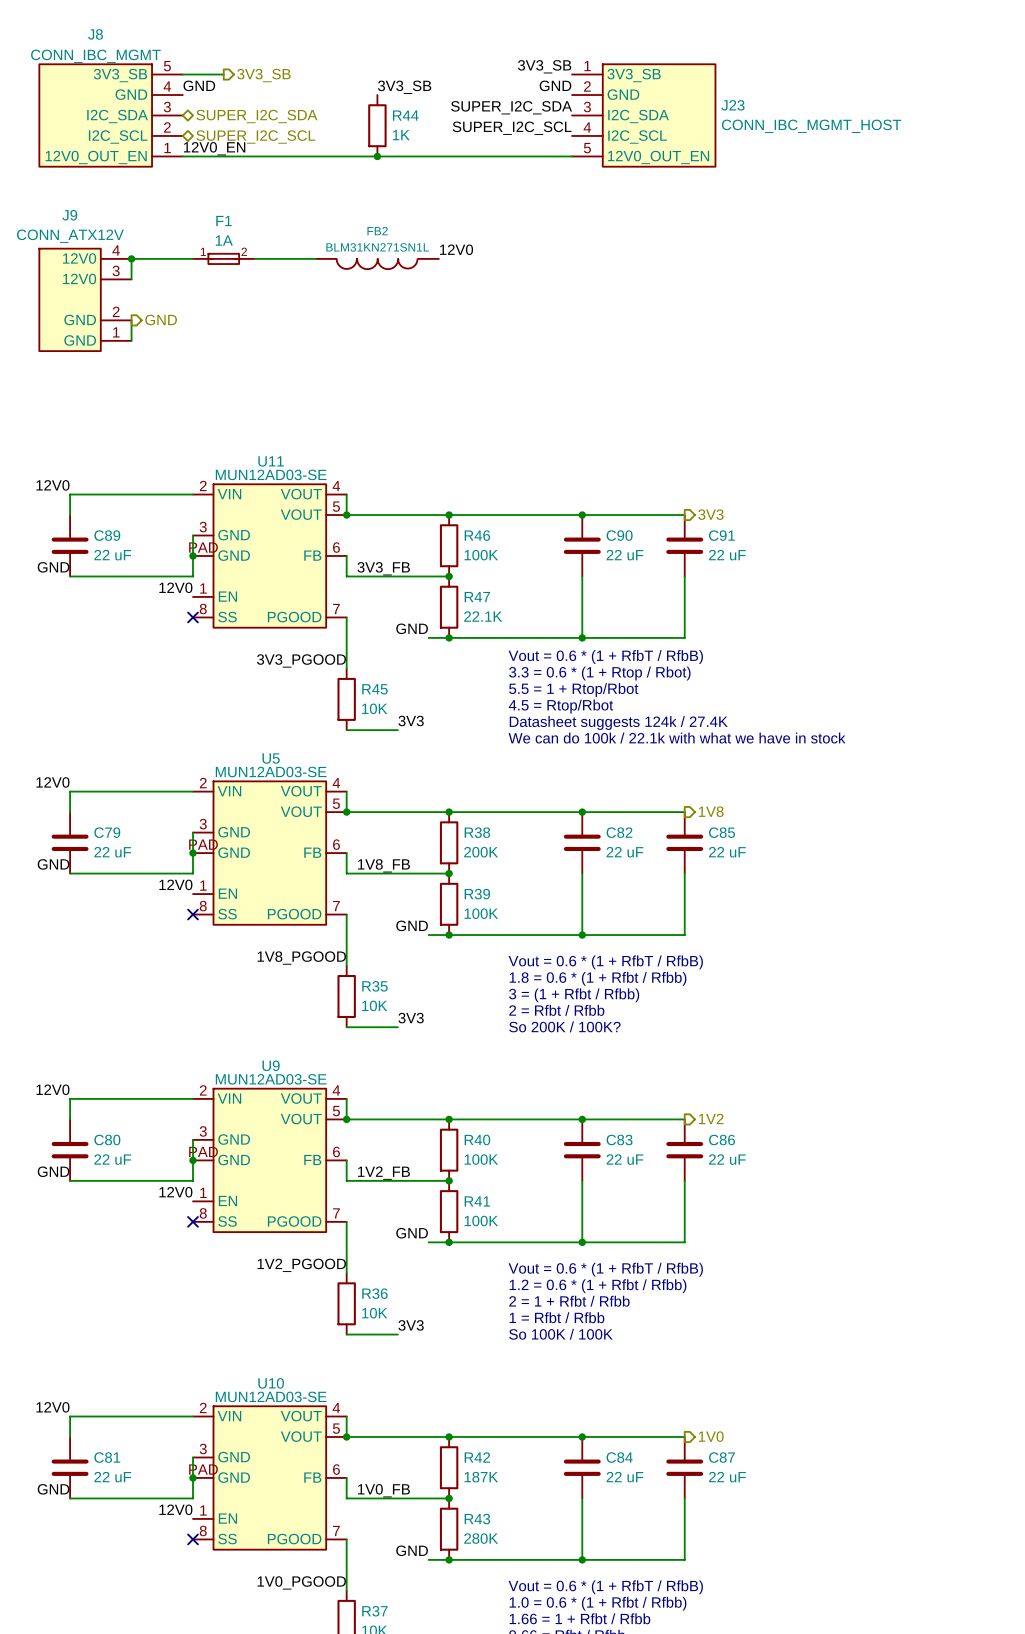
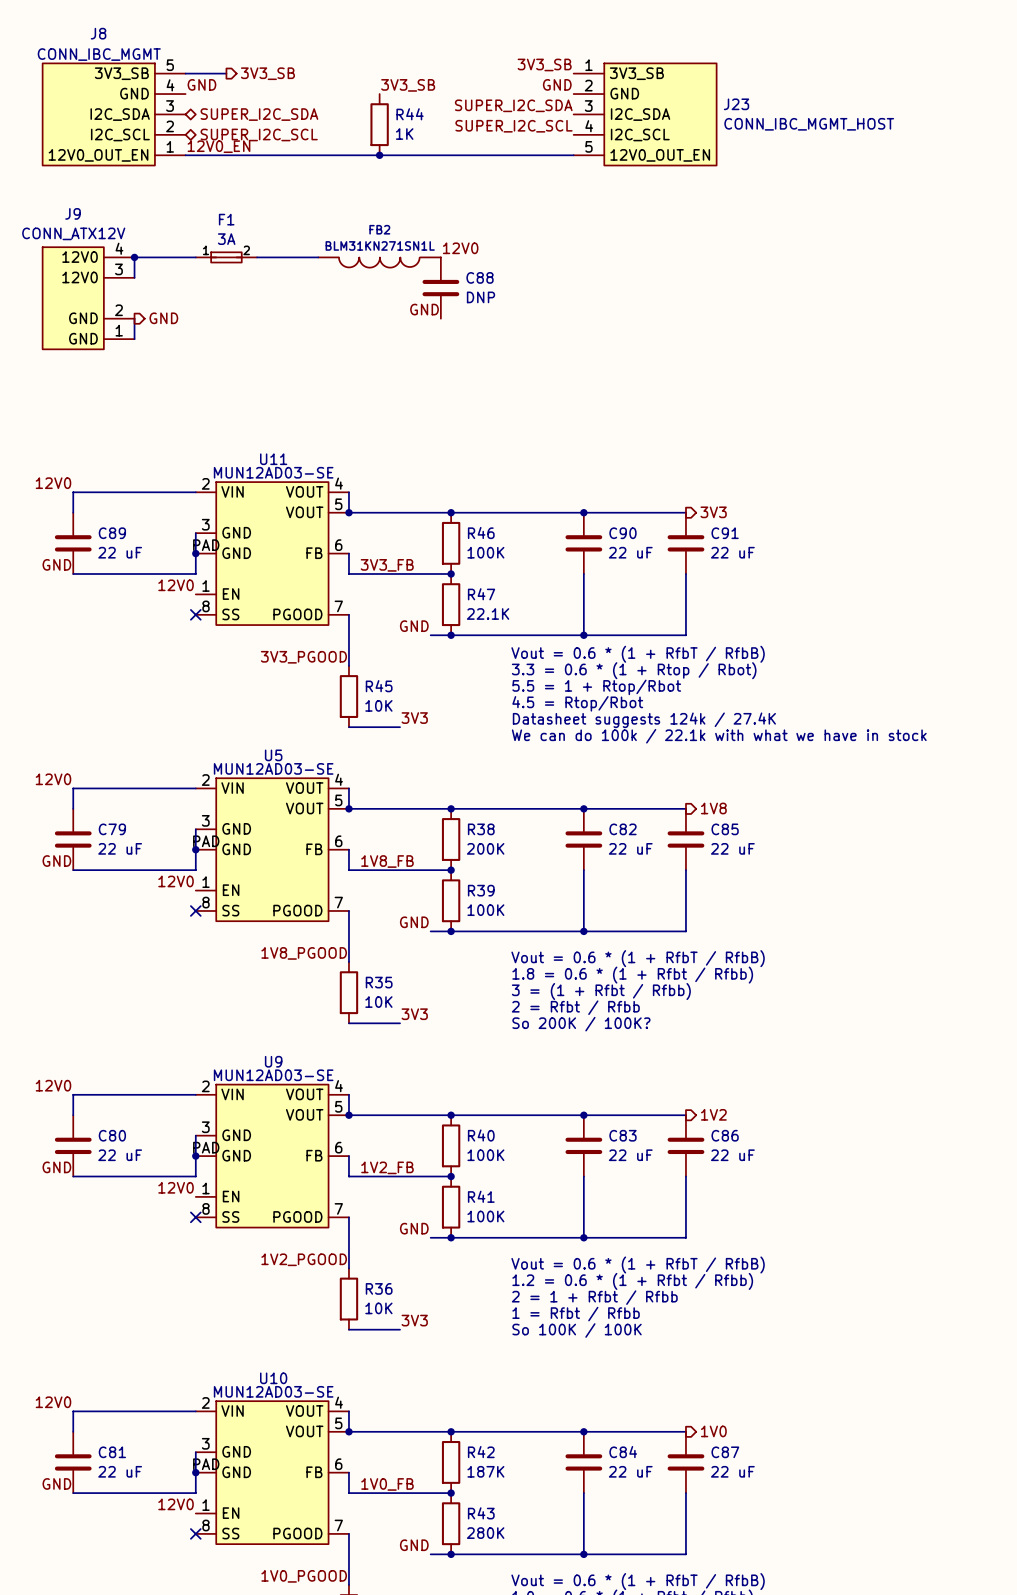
F1 value: 1A (224, 240) -> 3A (226, 239)
C88: none -> DNP (440, 288)
label: none -> GND (424, 309)

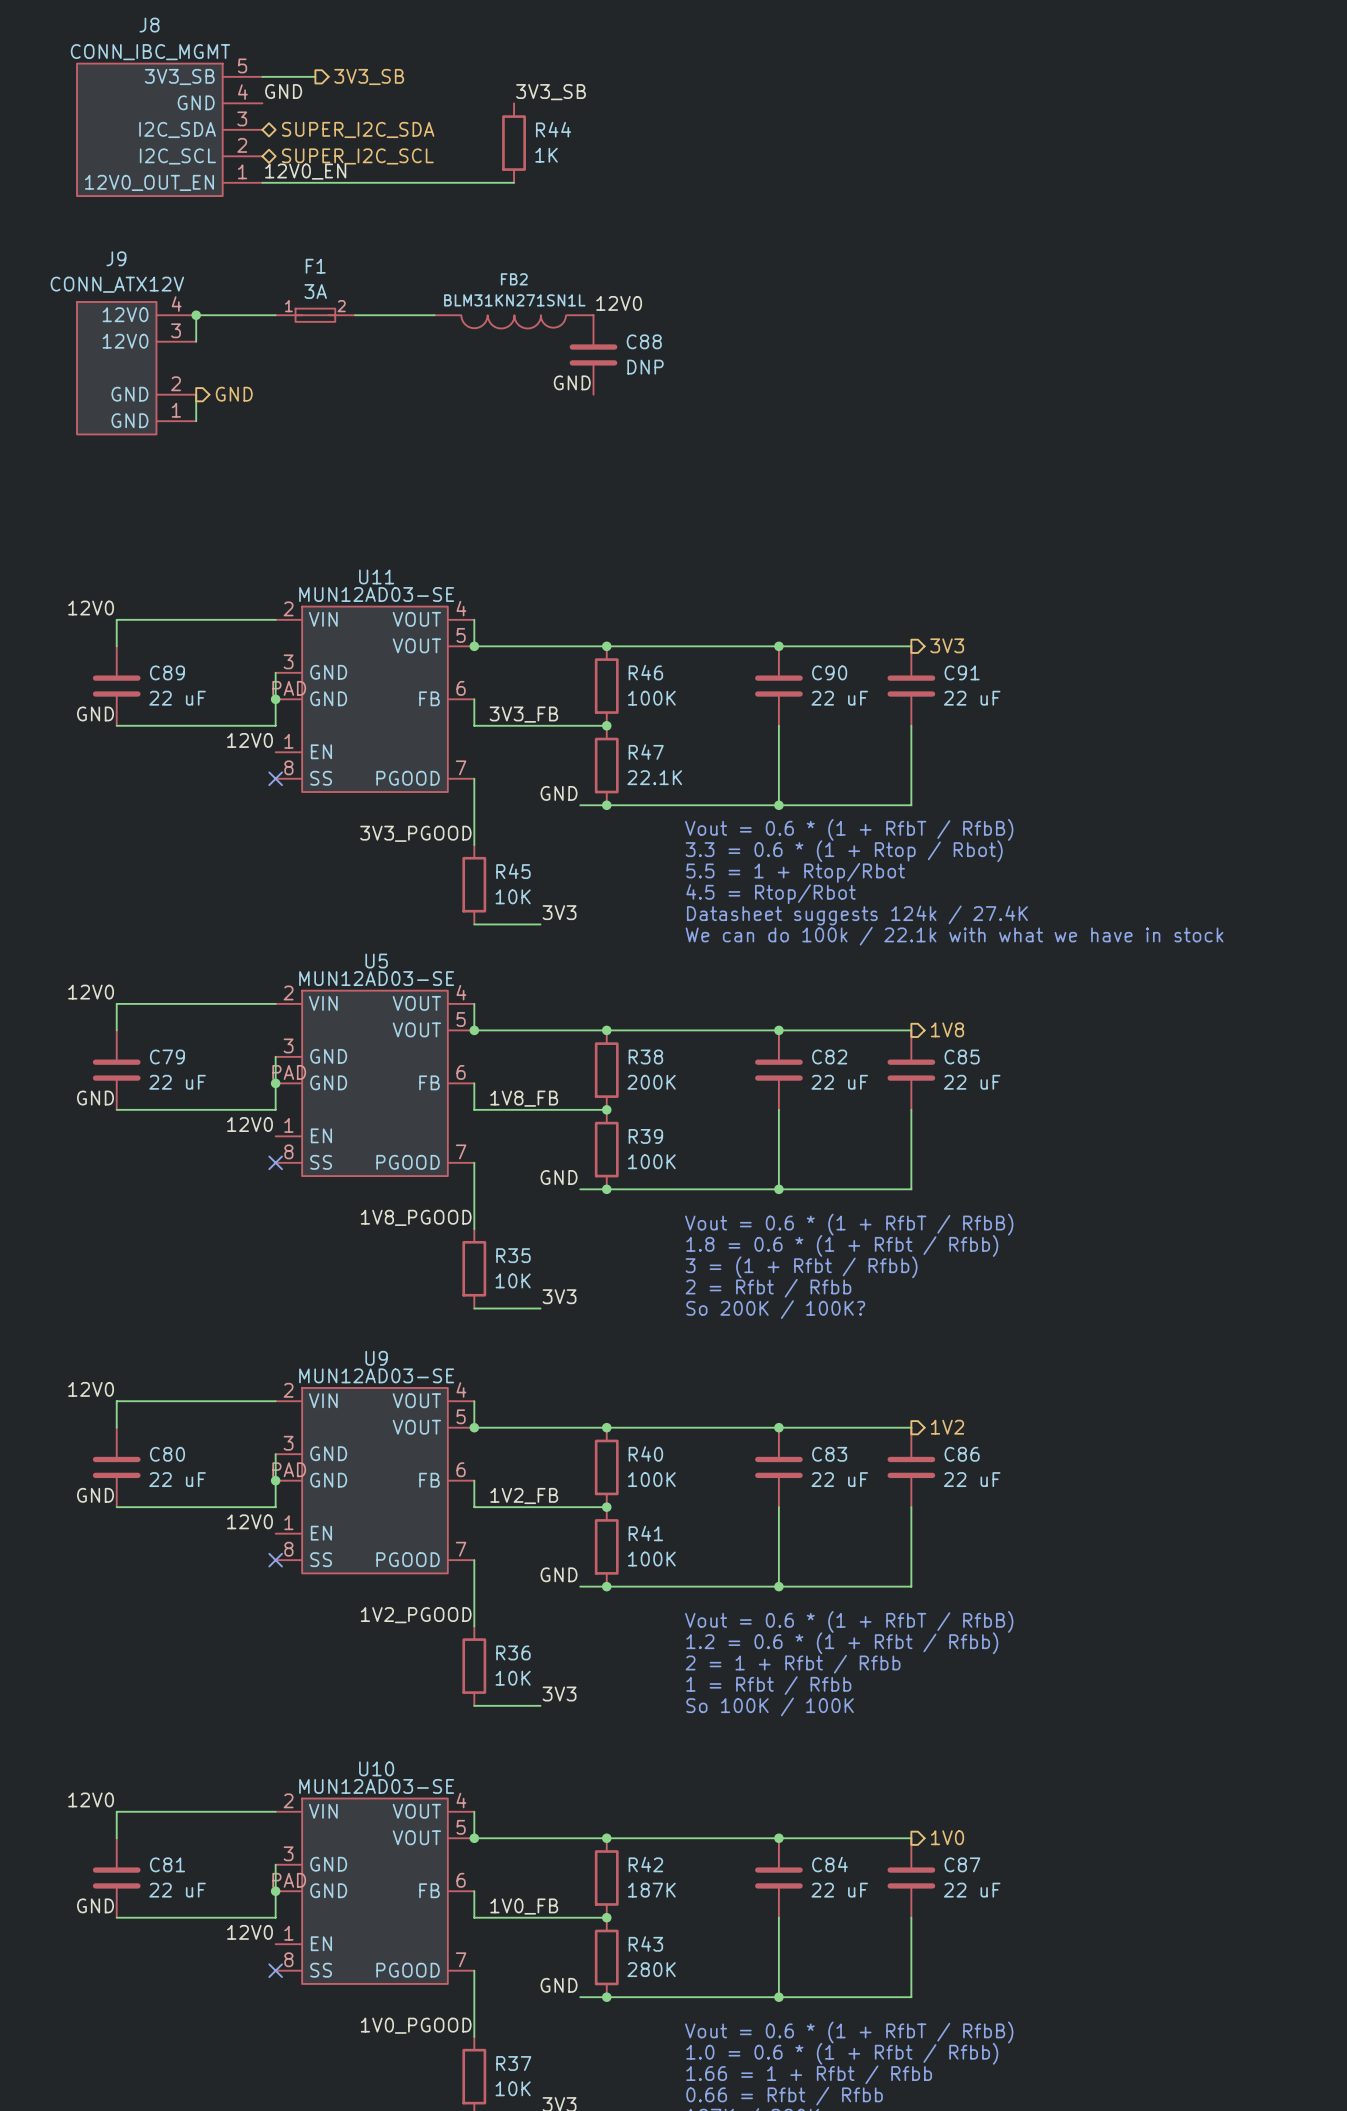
label: 3V3_SB (544, 64) -> none
label: GND (557, 84) -> none
label: SUPER_I2C_SDA (513, 105) -> none
J23: CONN_IBC_MGMT_HOST (645, 114) -> none
label: SUPER_I2C_SCL (514, 126) -> none
wire: (379, 155) (573, 155) -> none
junction: (379, 155) -> none

